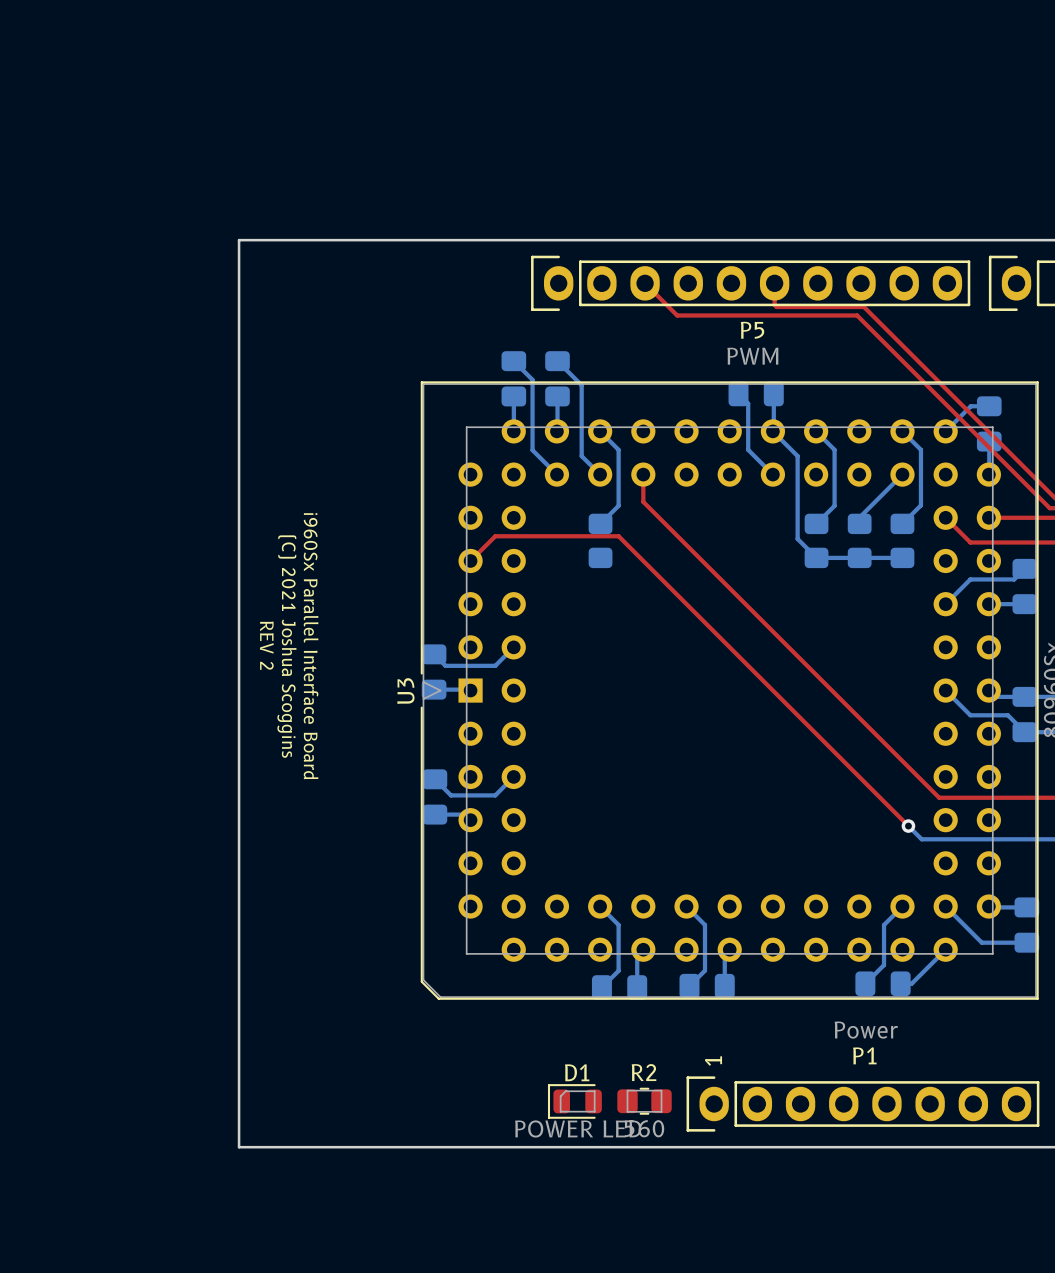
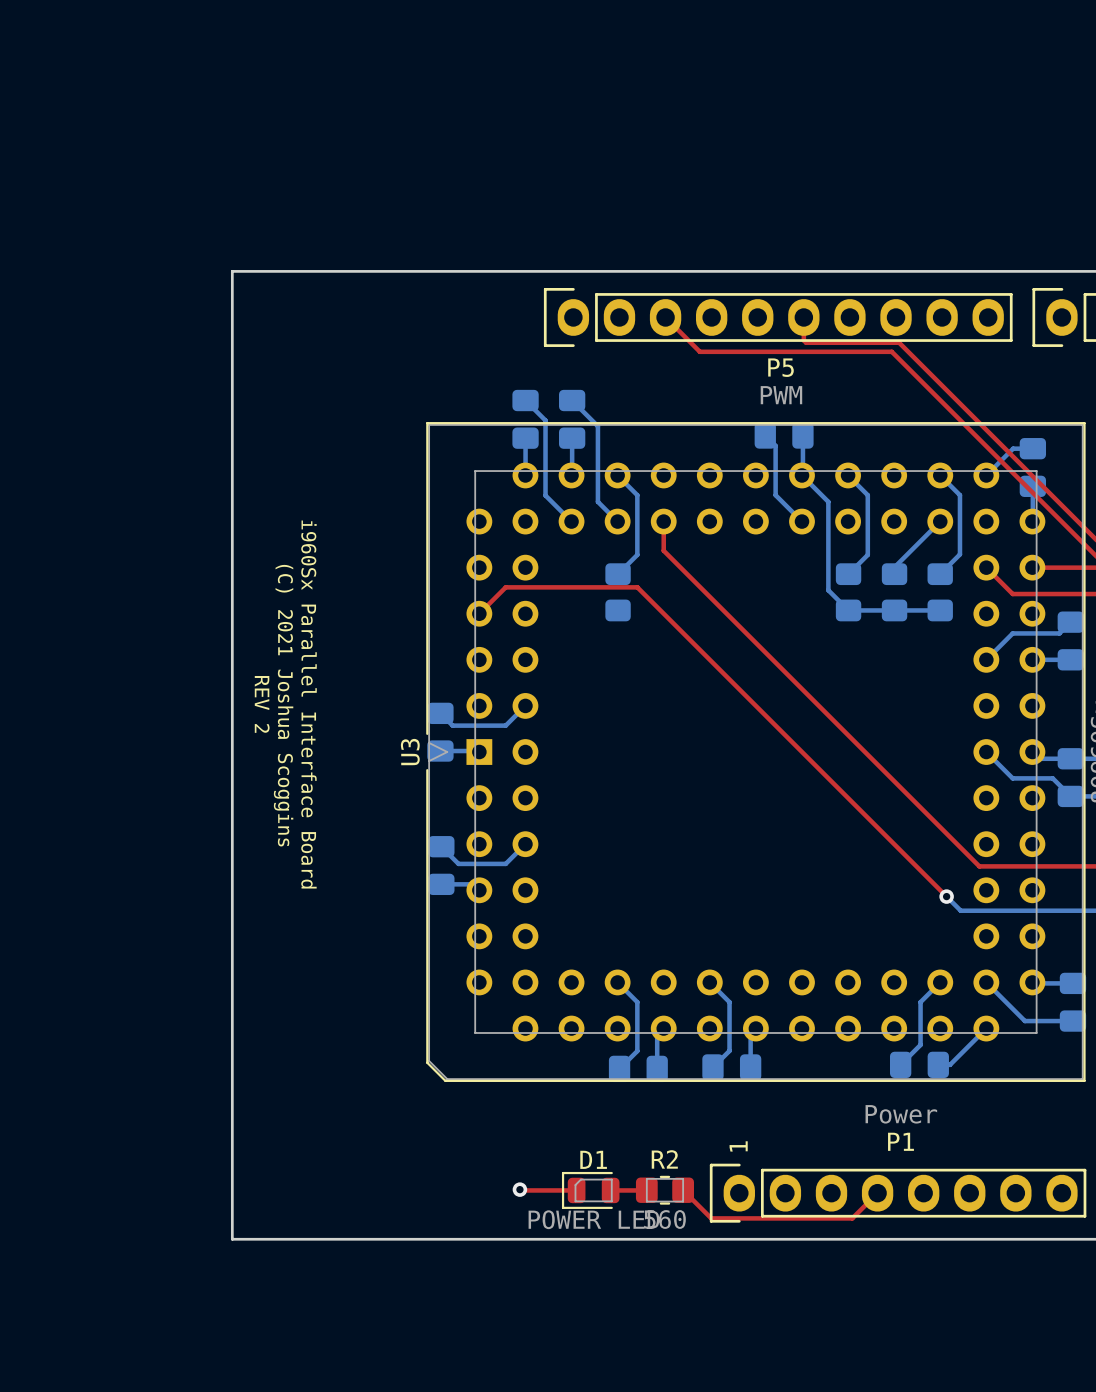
top track: none -> (519, 1189) (576, 1190)
via: none -> (519, 1189)
top track: none -> (610, 1190) (646, 1190)
top track: none -> (683, 1190) (711, 1218) (852, 1218) (877, 1193)

